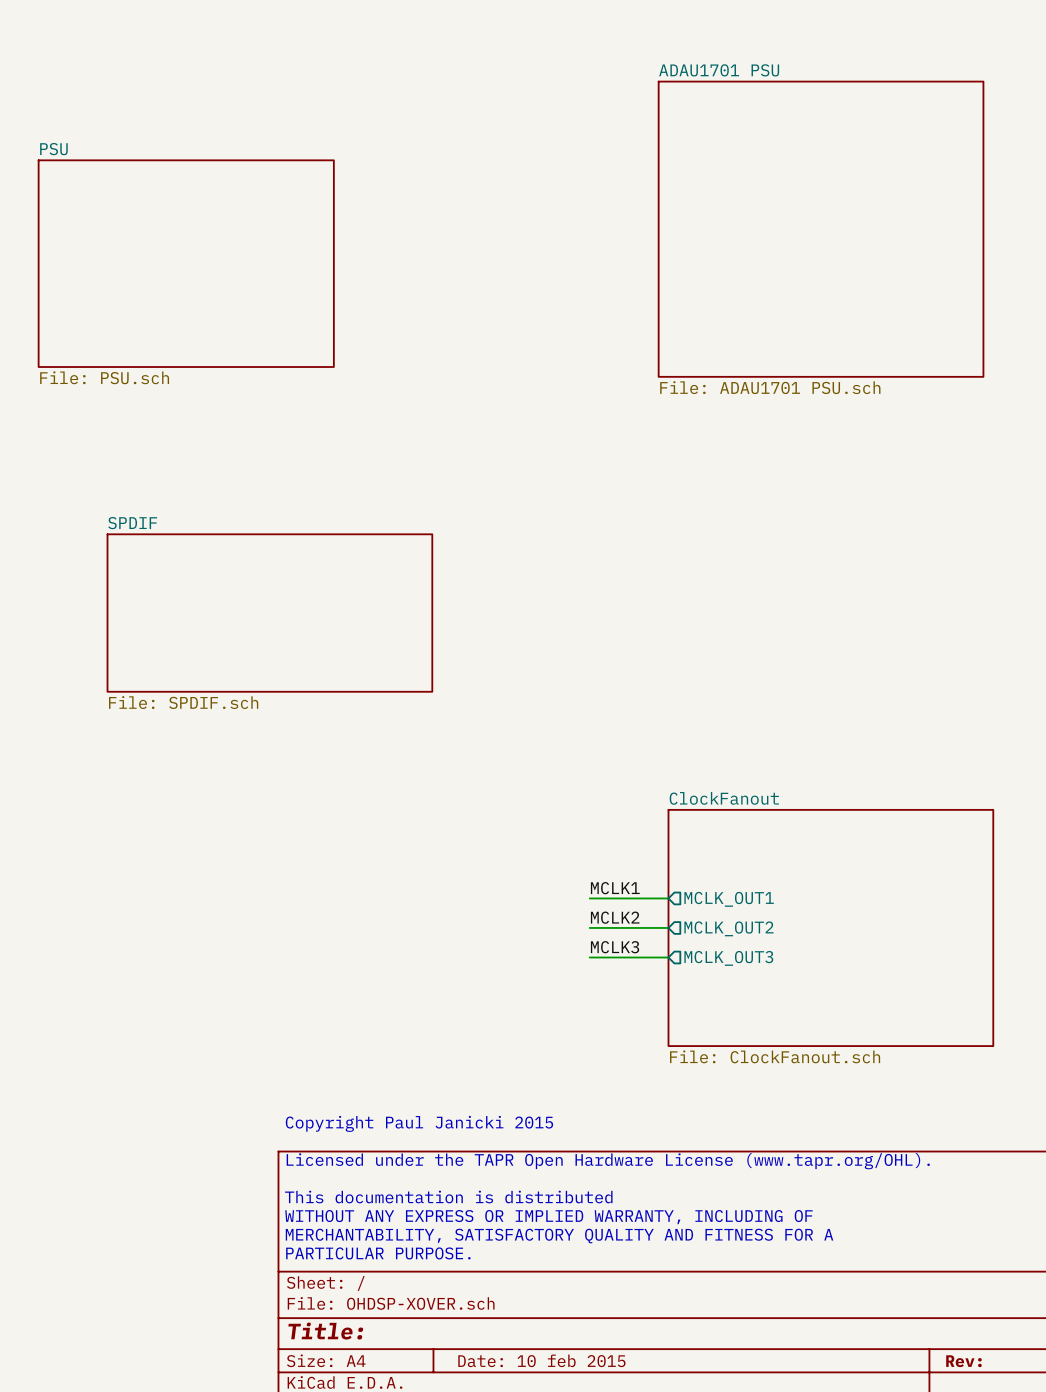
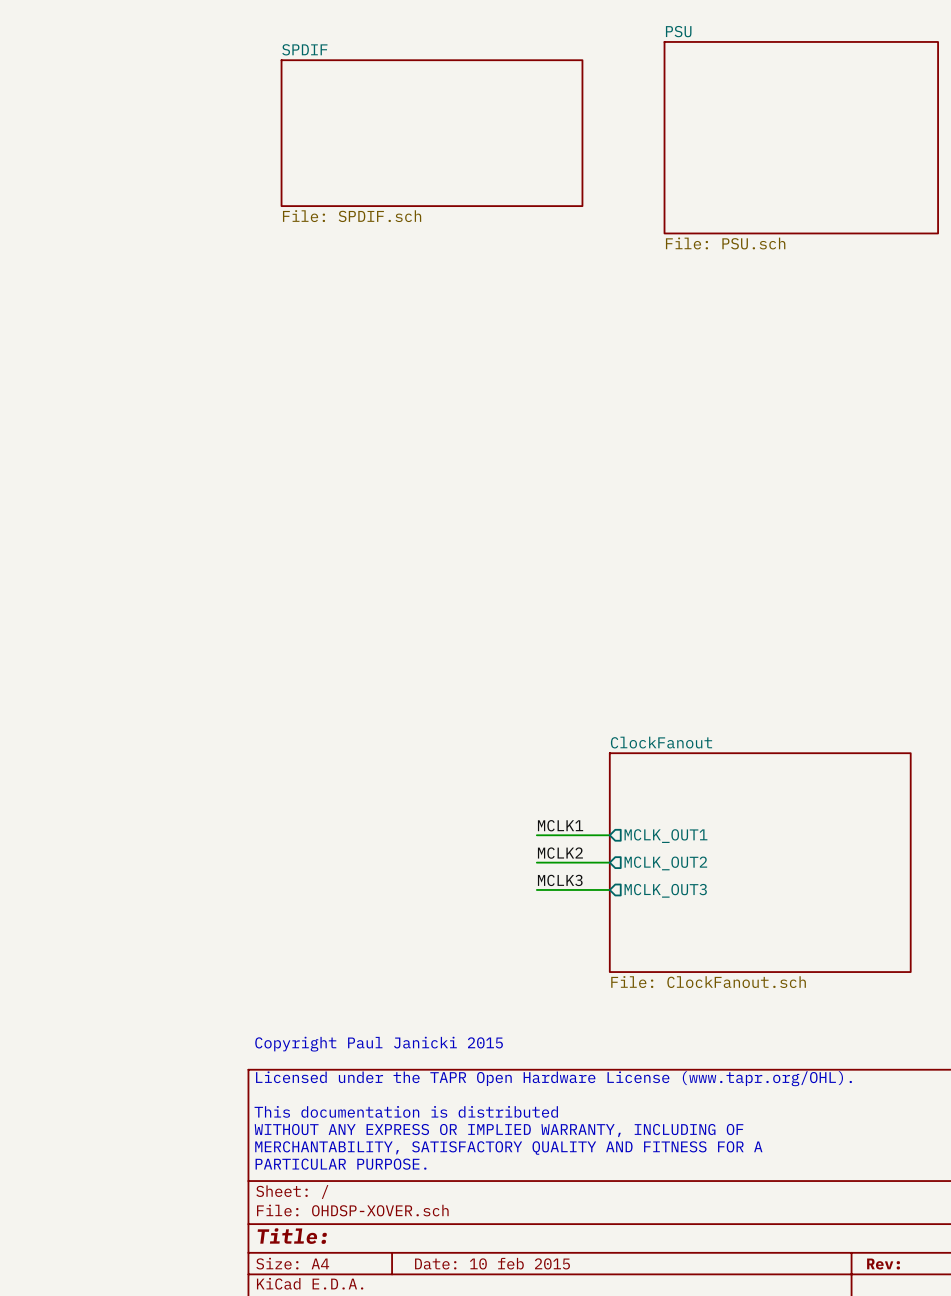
sheet SPDIF: none -> File: SPDIF.sch (431, 133)
sheet PSU: none -> File: PSU.sch (801, 137)
sheet ADAU1701 PSU: File: ADAU1701 PSU.sch (821, 229) -> none
sheet PSU: File: PSU.sch (186, 263) -> none
sheet SPDIF: File: SPDIF.sch (269, 613) -> none

